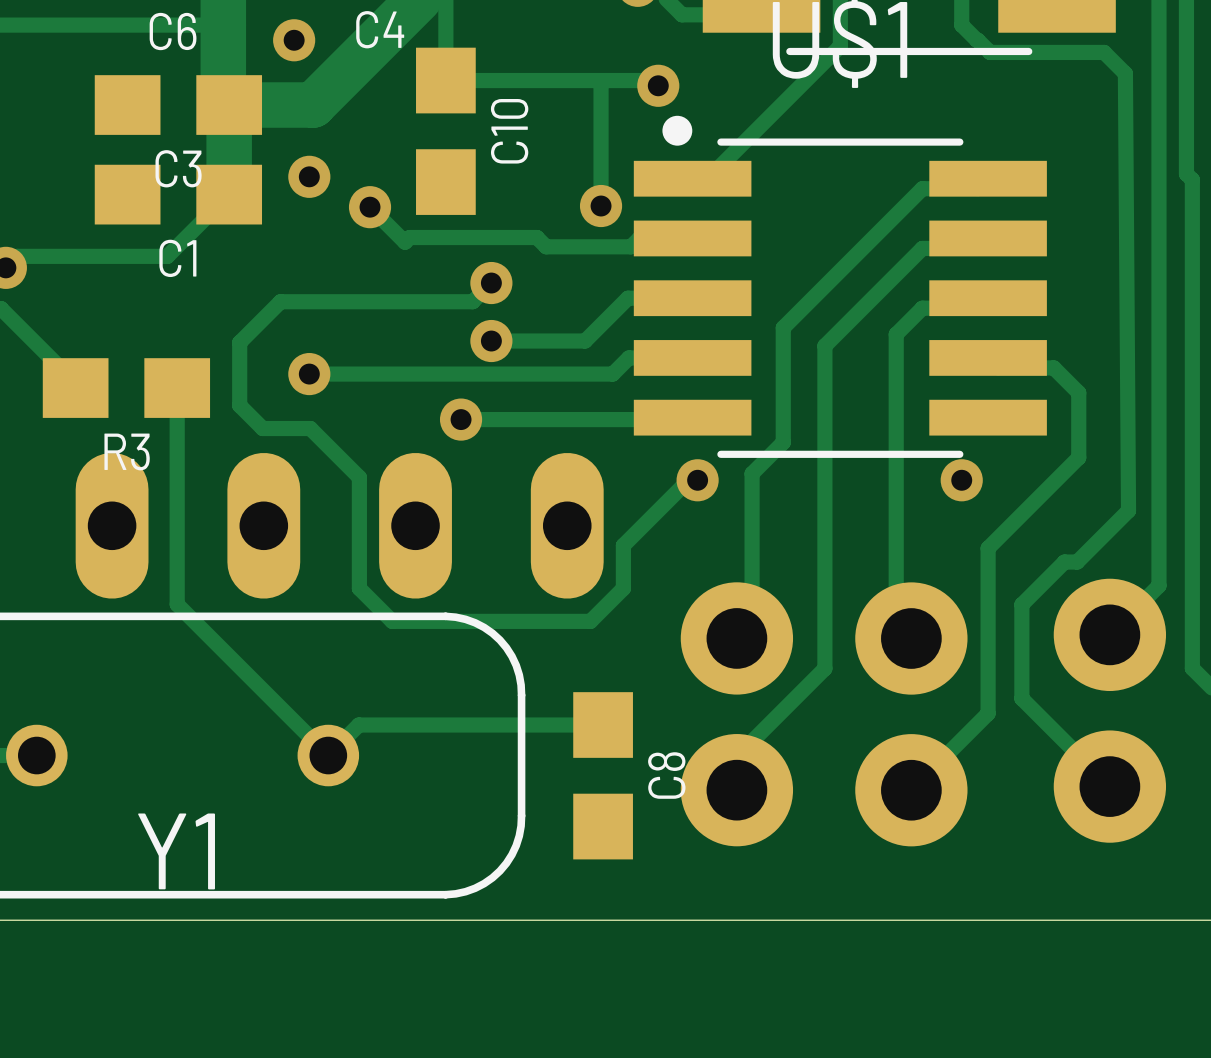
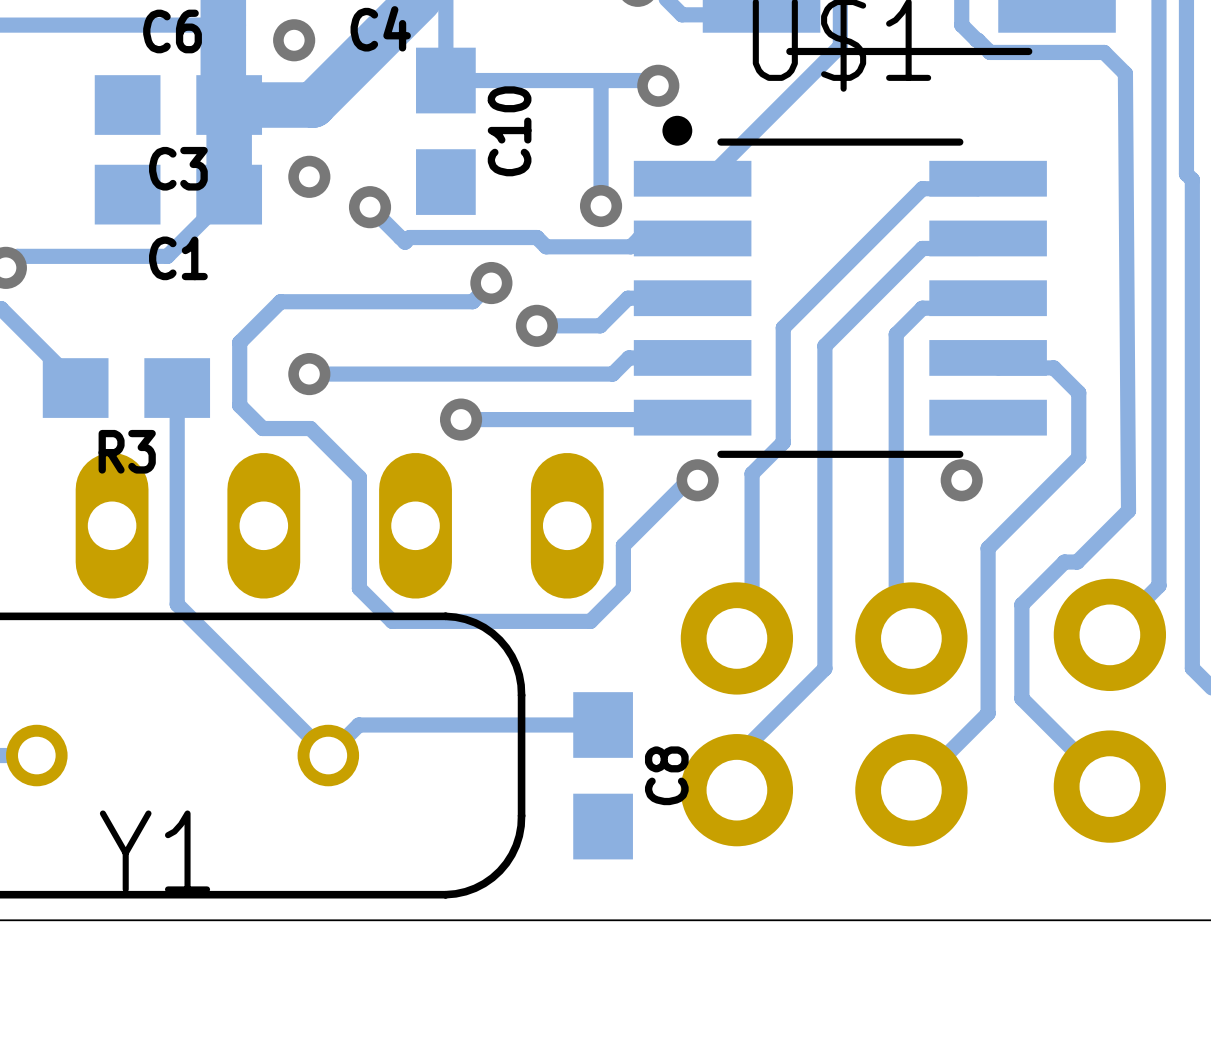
track: (600, 325) (585, 341) (491, 341) -> (600, 325) (536, 325)
via position: (491, 341) -> (536, 325)

